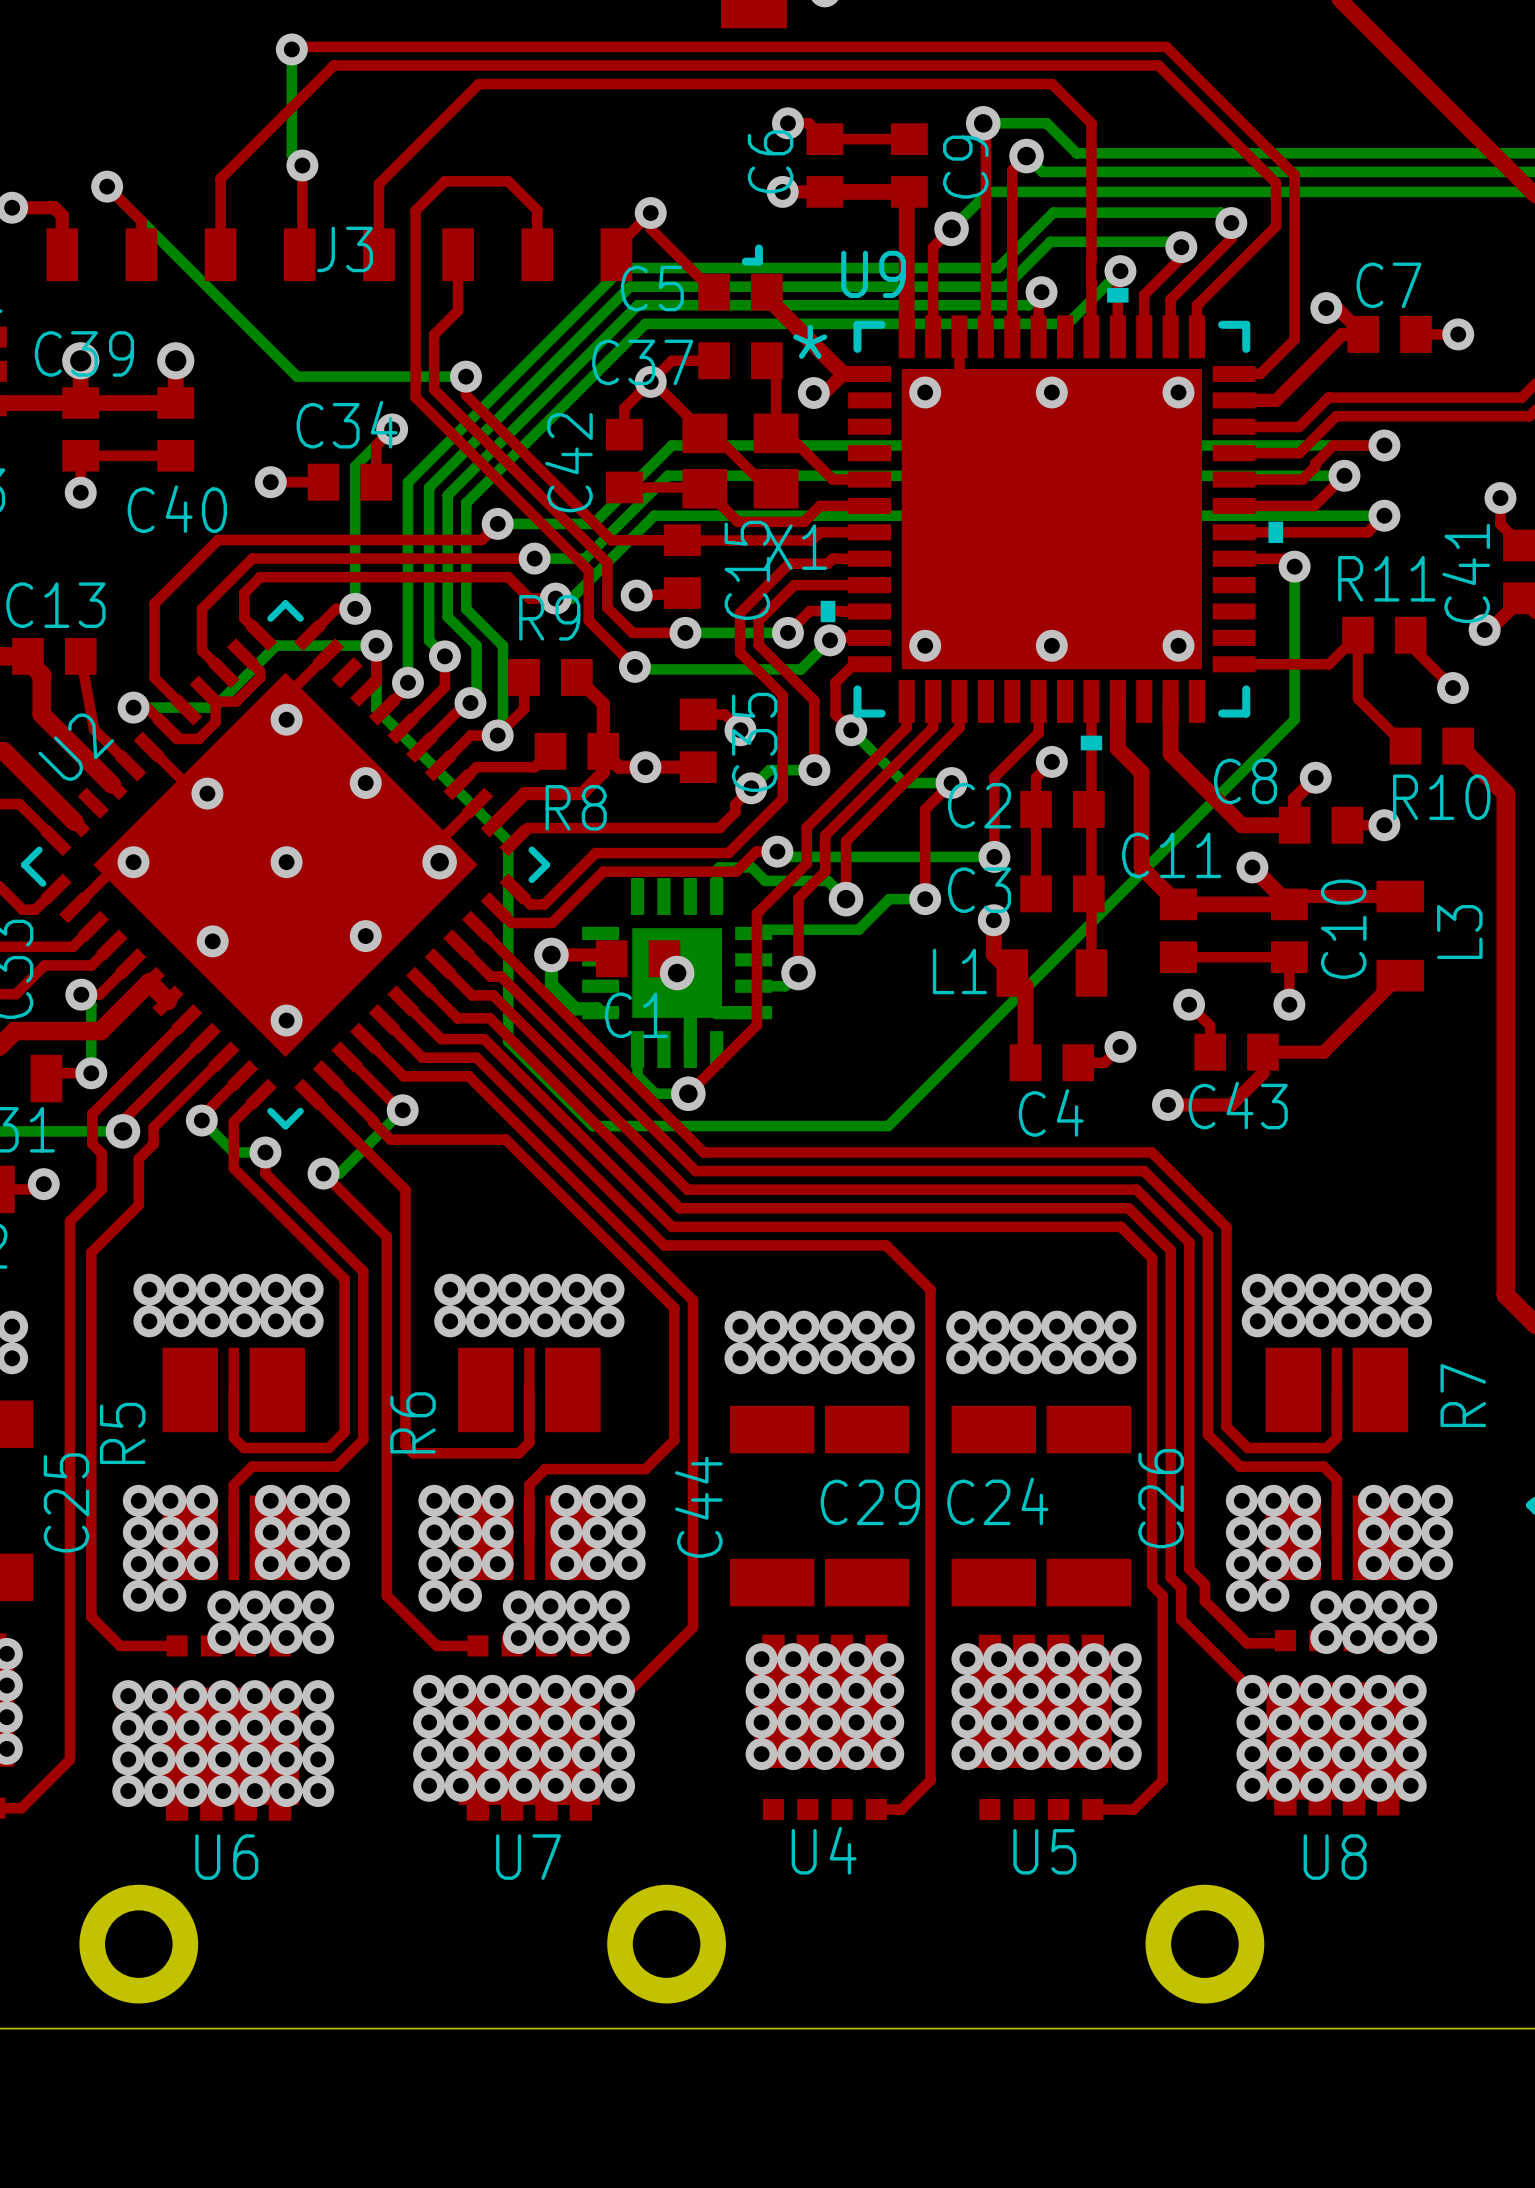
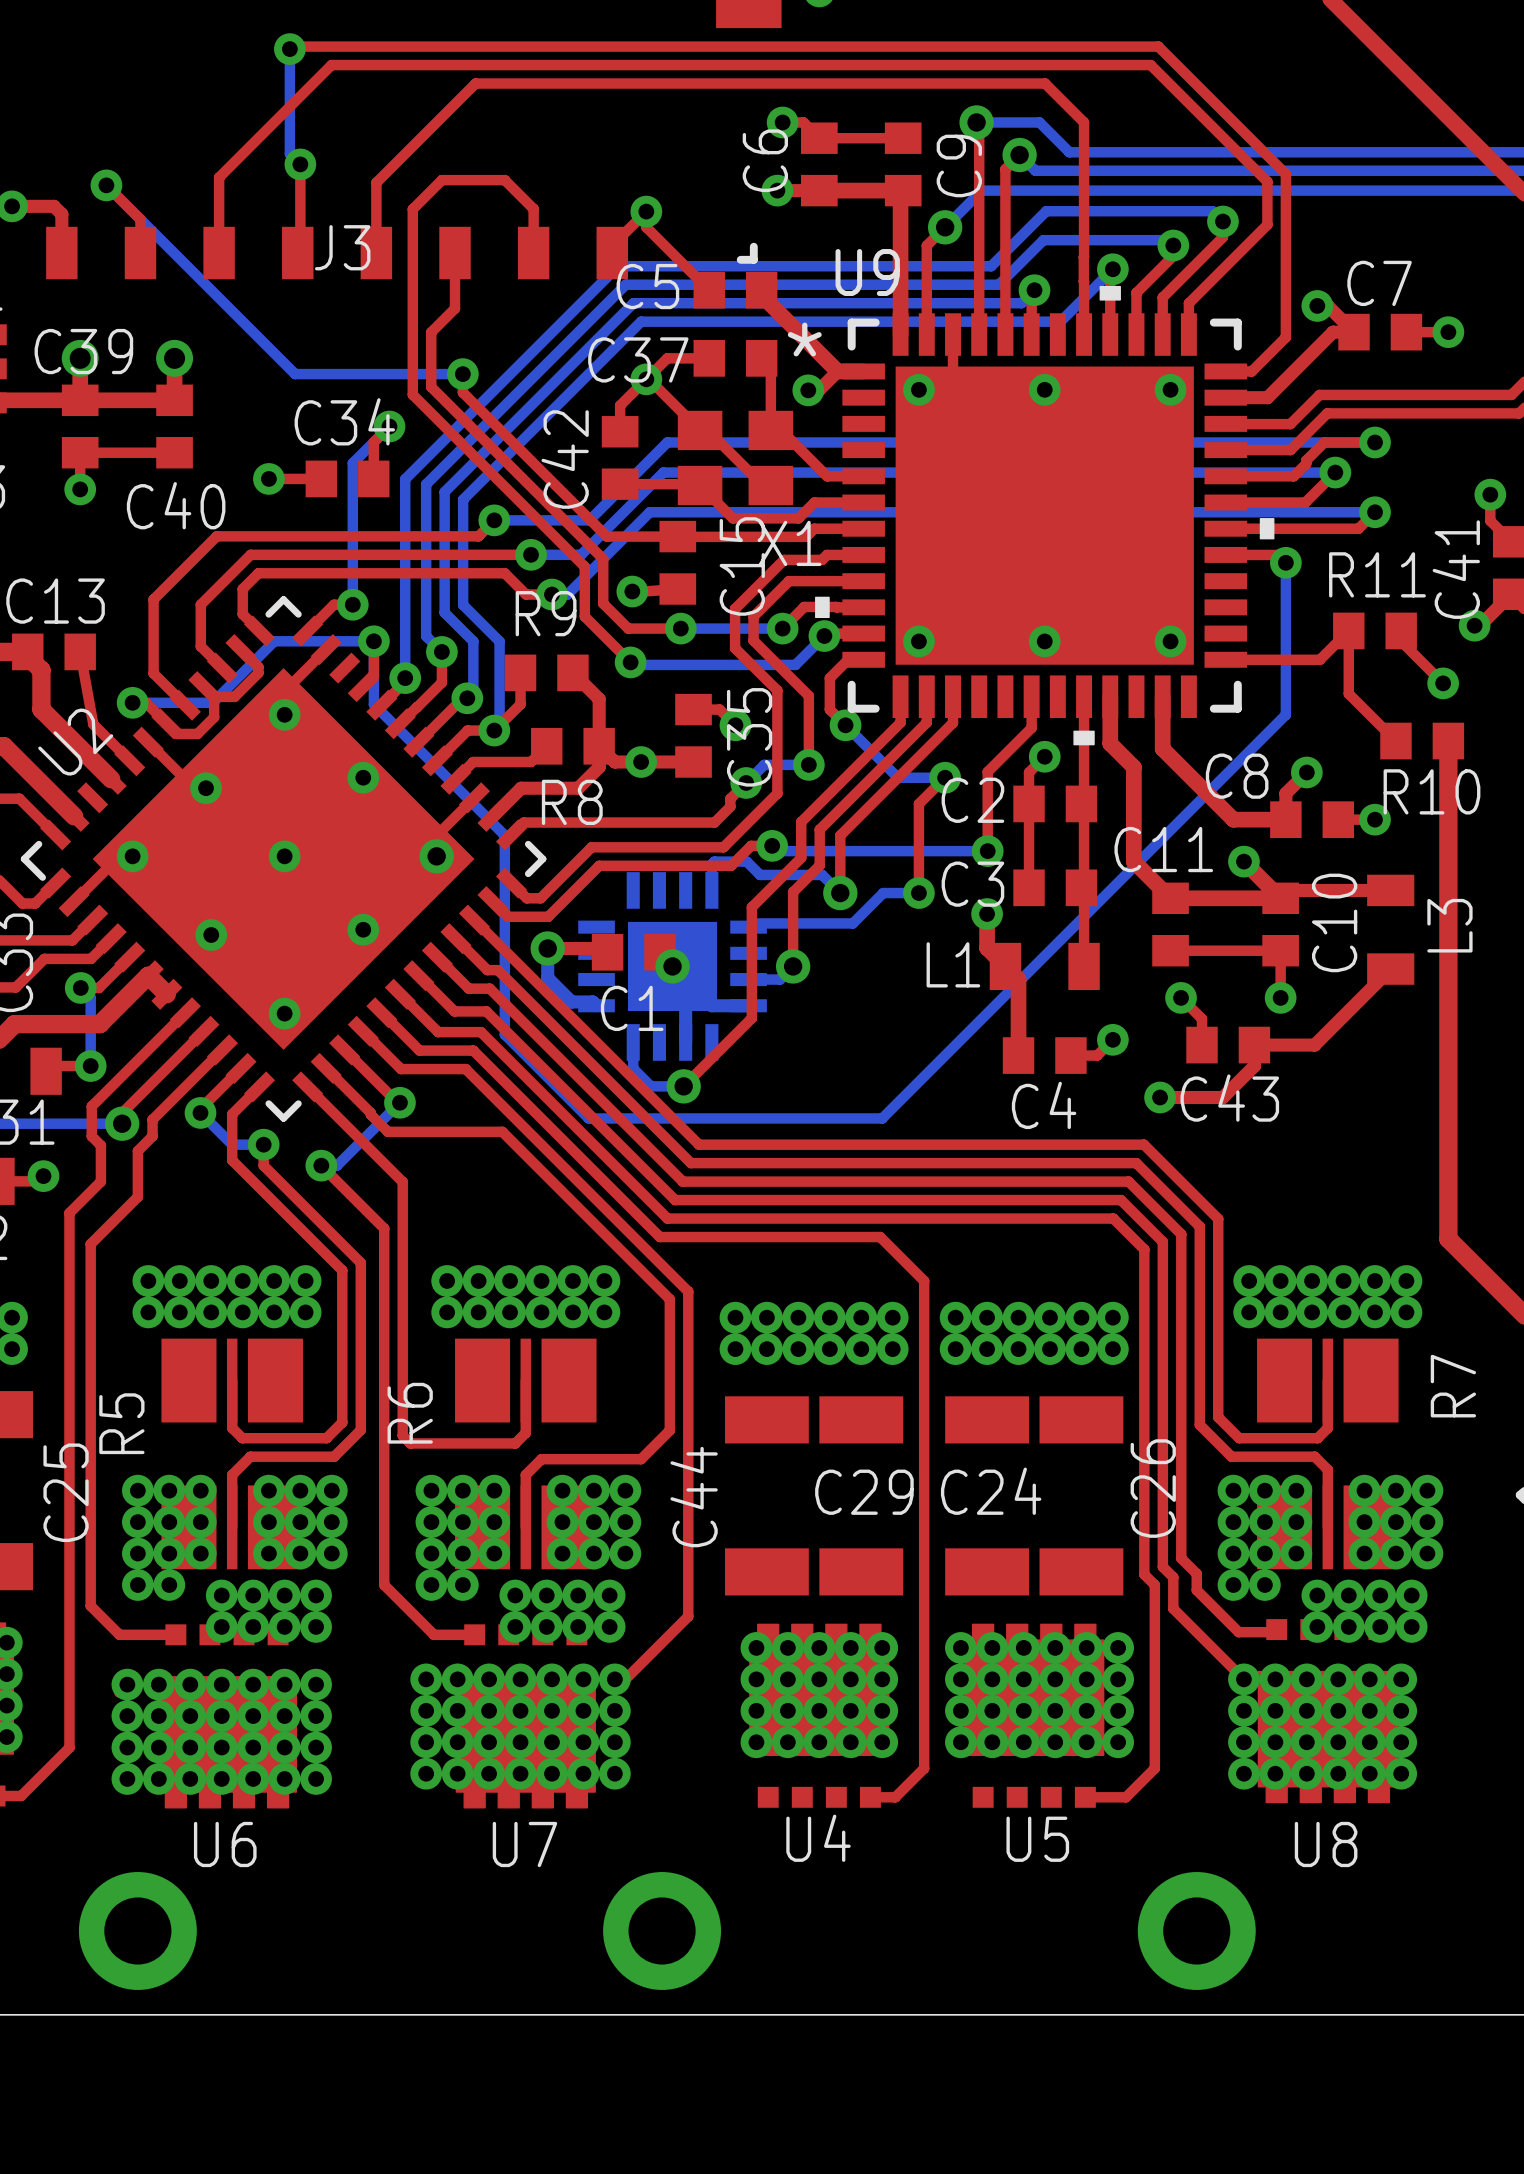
top track: (1458, 746) (1505, 793) (1505, 1294) -> (1448, 741) (1448, 1239) (1495, 1286)

